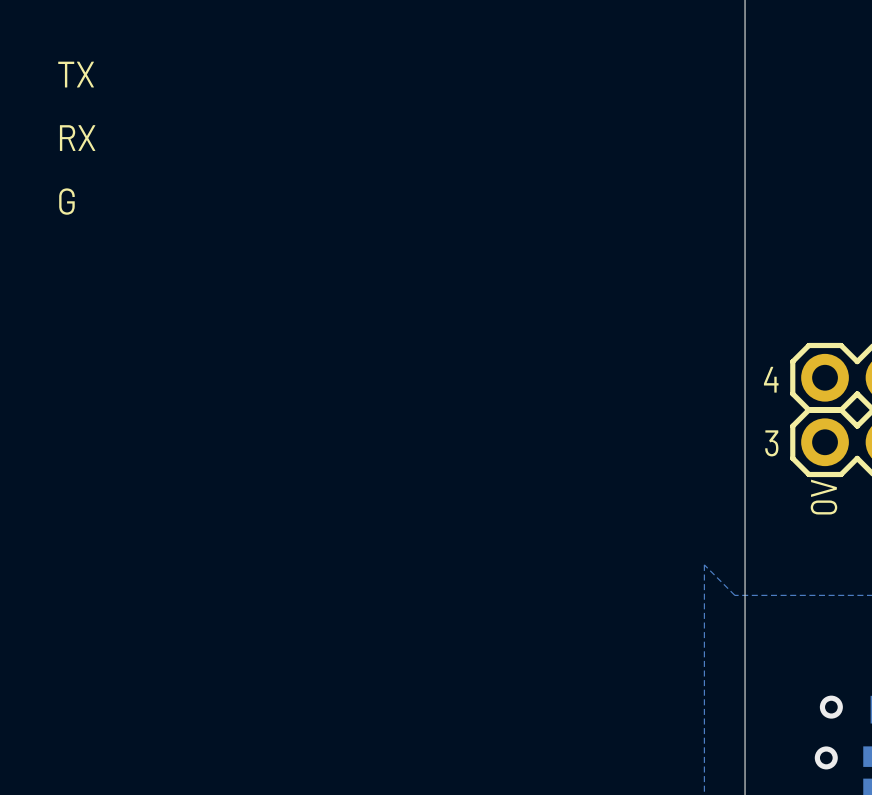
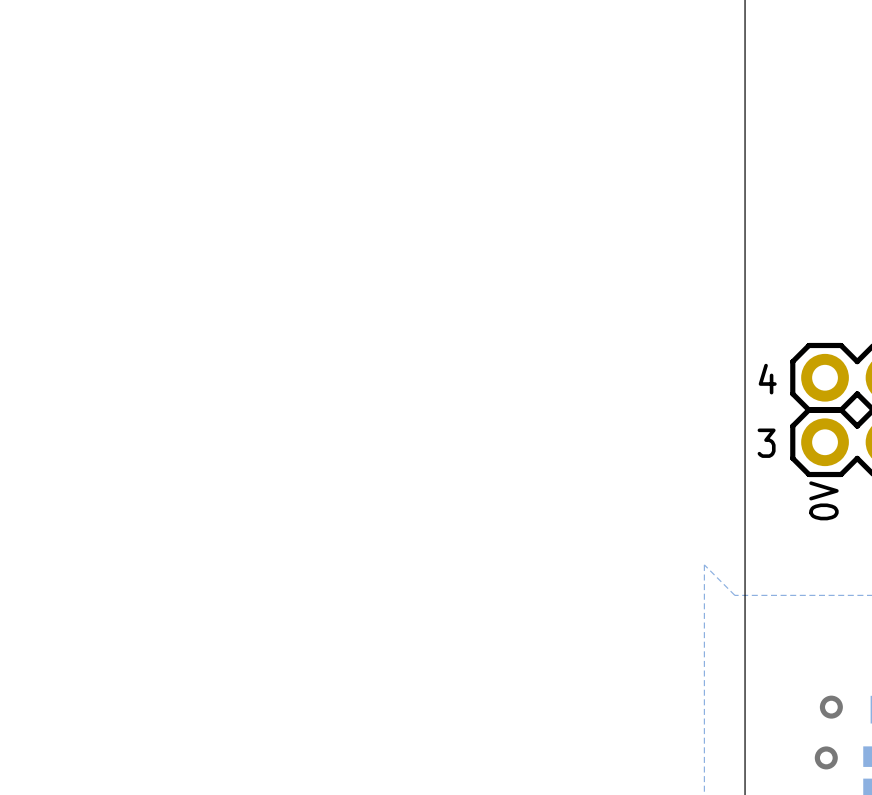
text: TX (76, 74) -> none
text: RX (77, 138) -> none
text: G (66, 201) -> none

